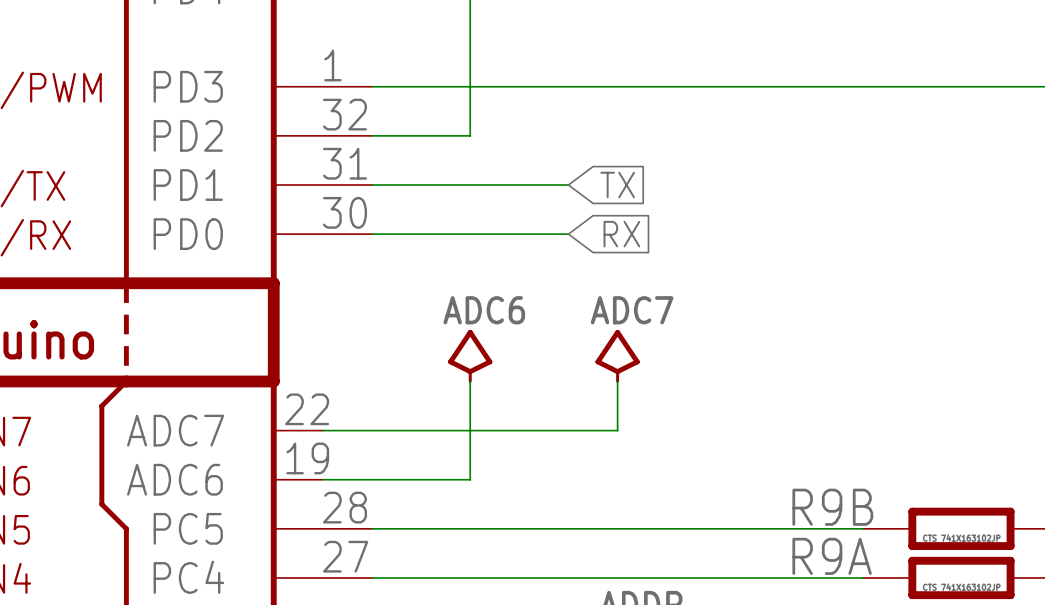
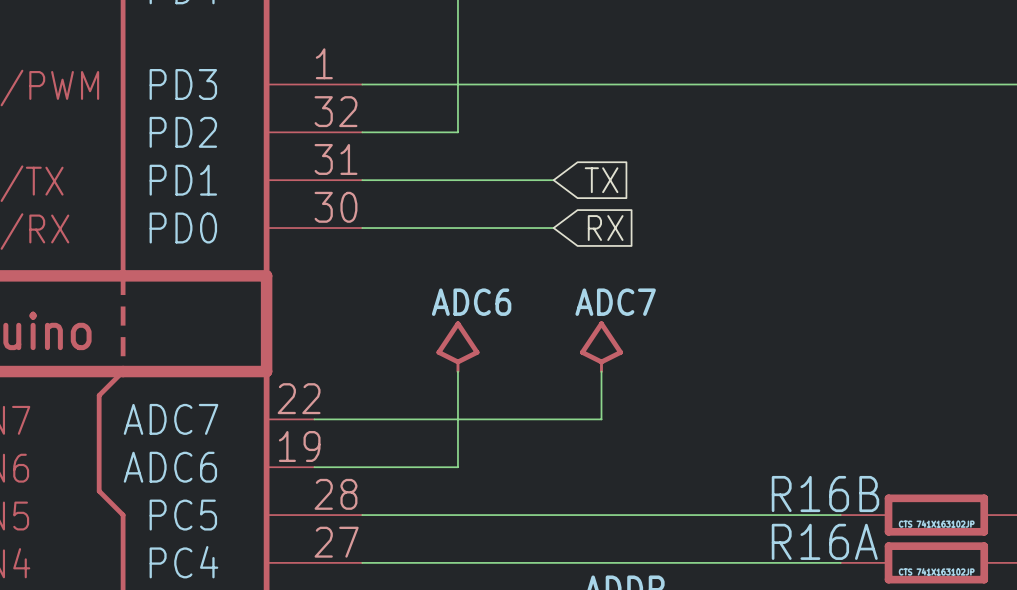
R9B name: R9B (832, 507) -> R16B (825, 494)
R9A name: R9A (832, 556) -> R16A (824, 541)

